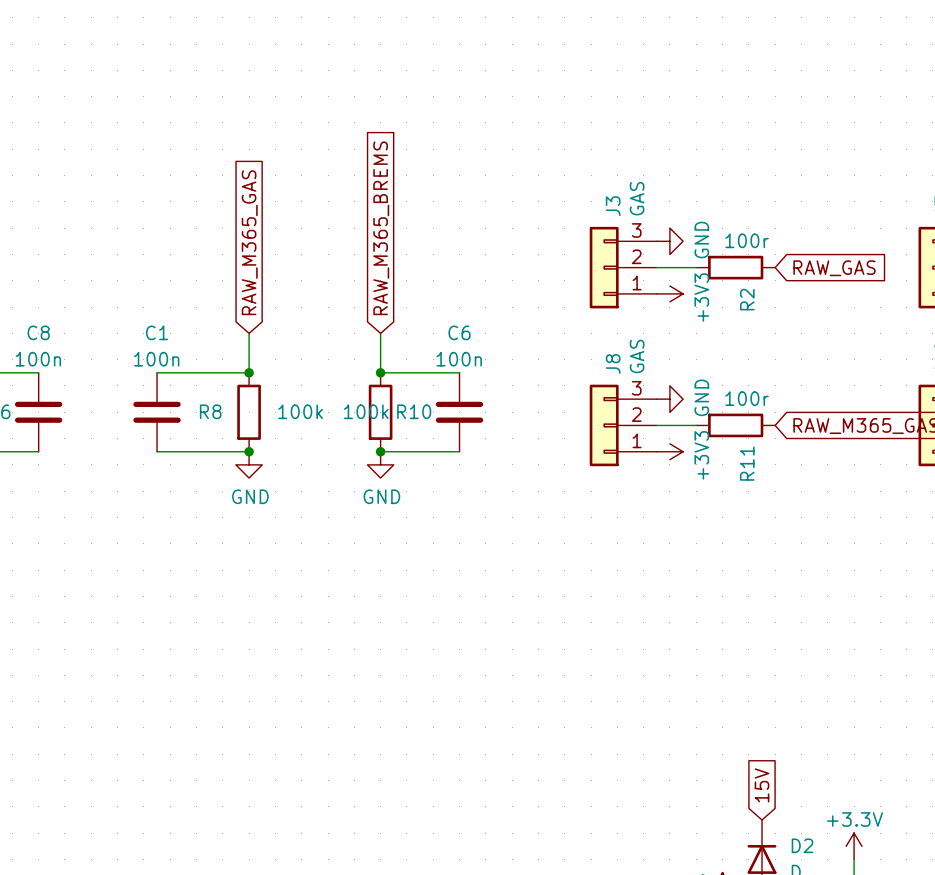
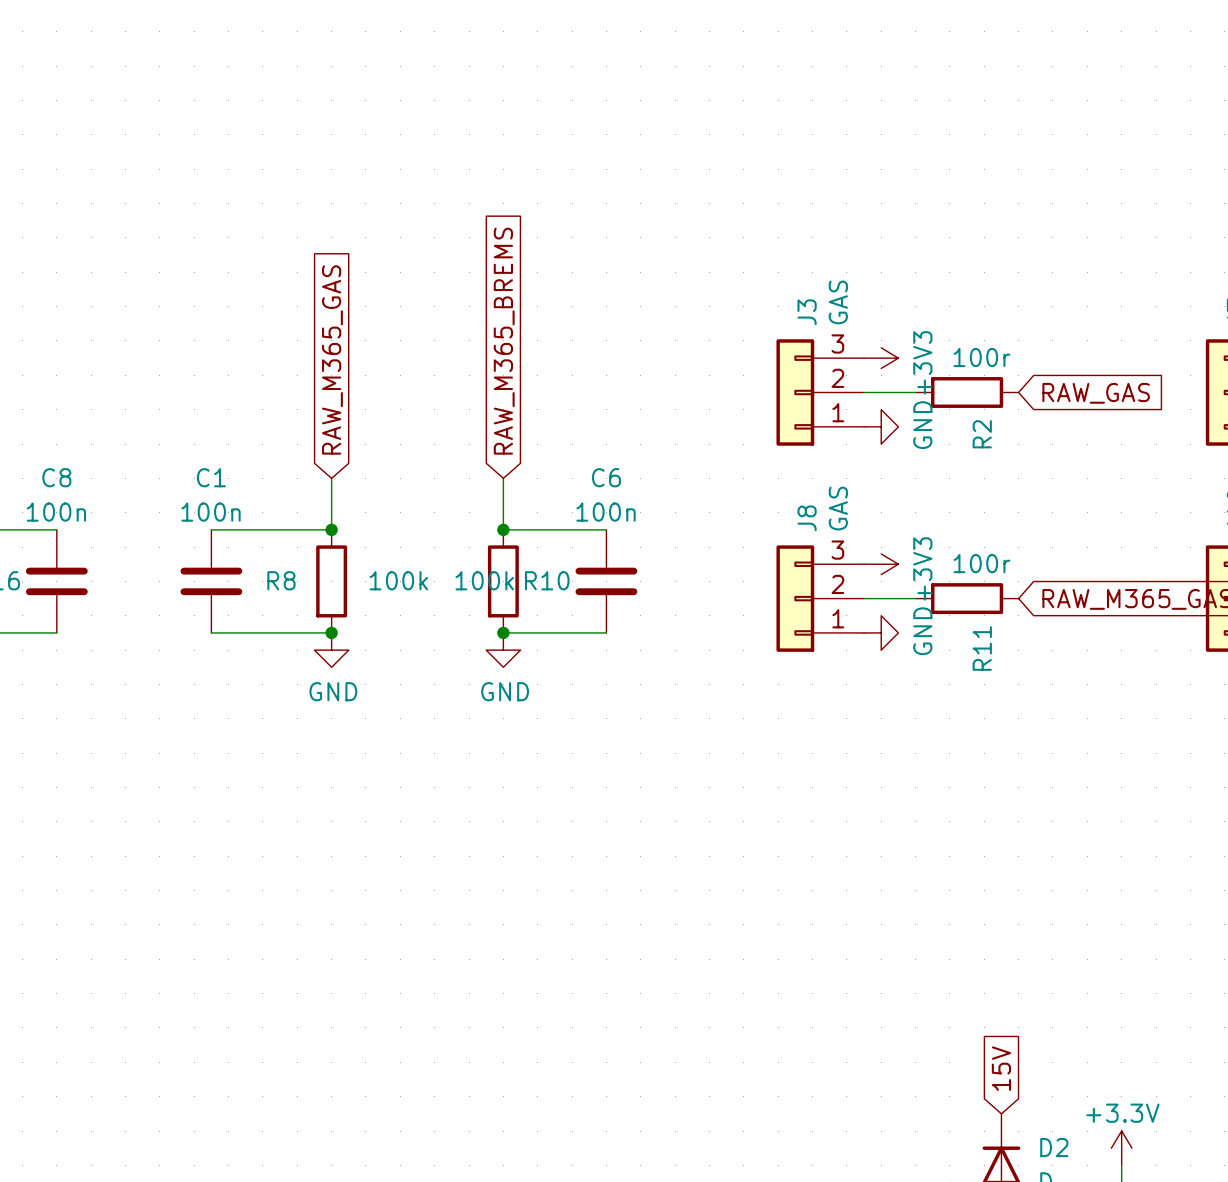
power symbol: GND (669, 241) -> +3V3 (881, 358)
power symbol: +3V3 (669, 293) -> GND (881, 426)
power symbol: GND (669, 399) -> +3V3 (881, 564)
power symbol: +3V3 (669, 451) -> GND (881, 632)

